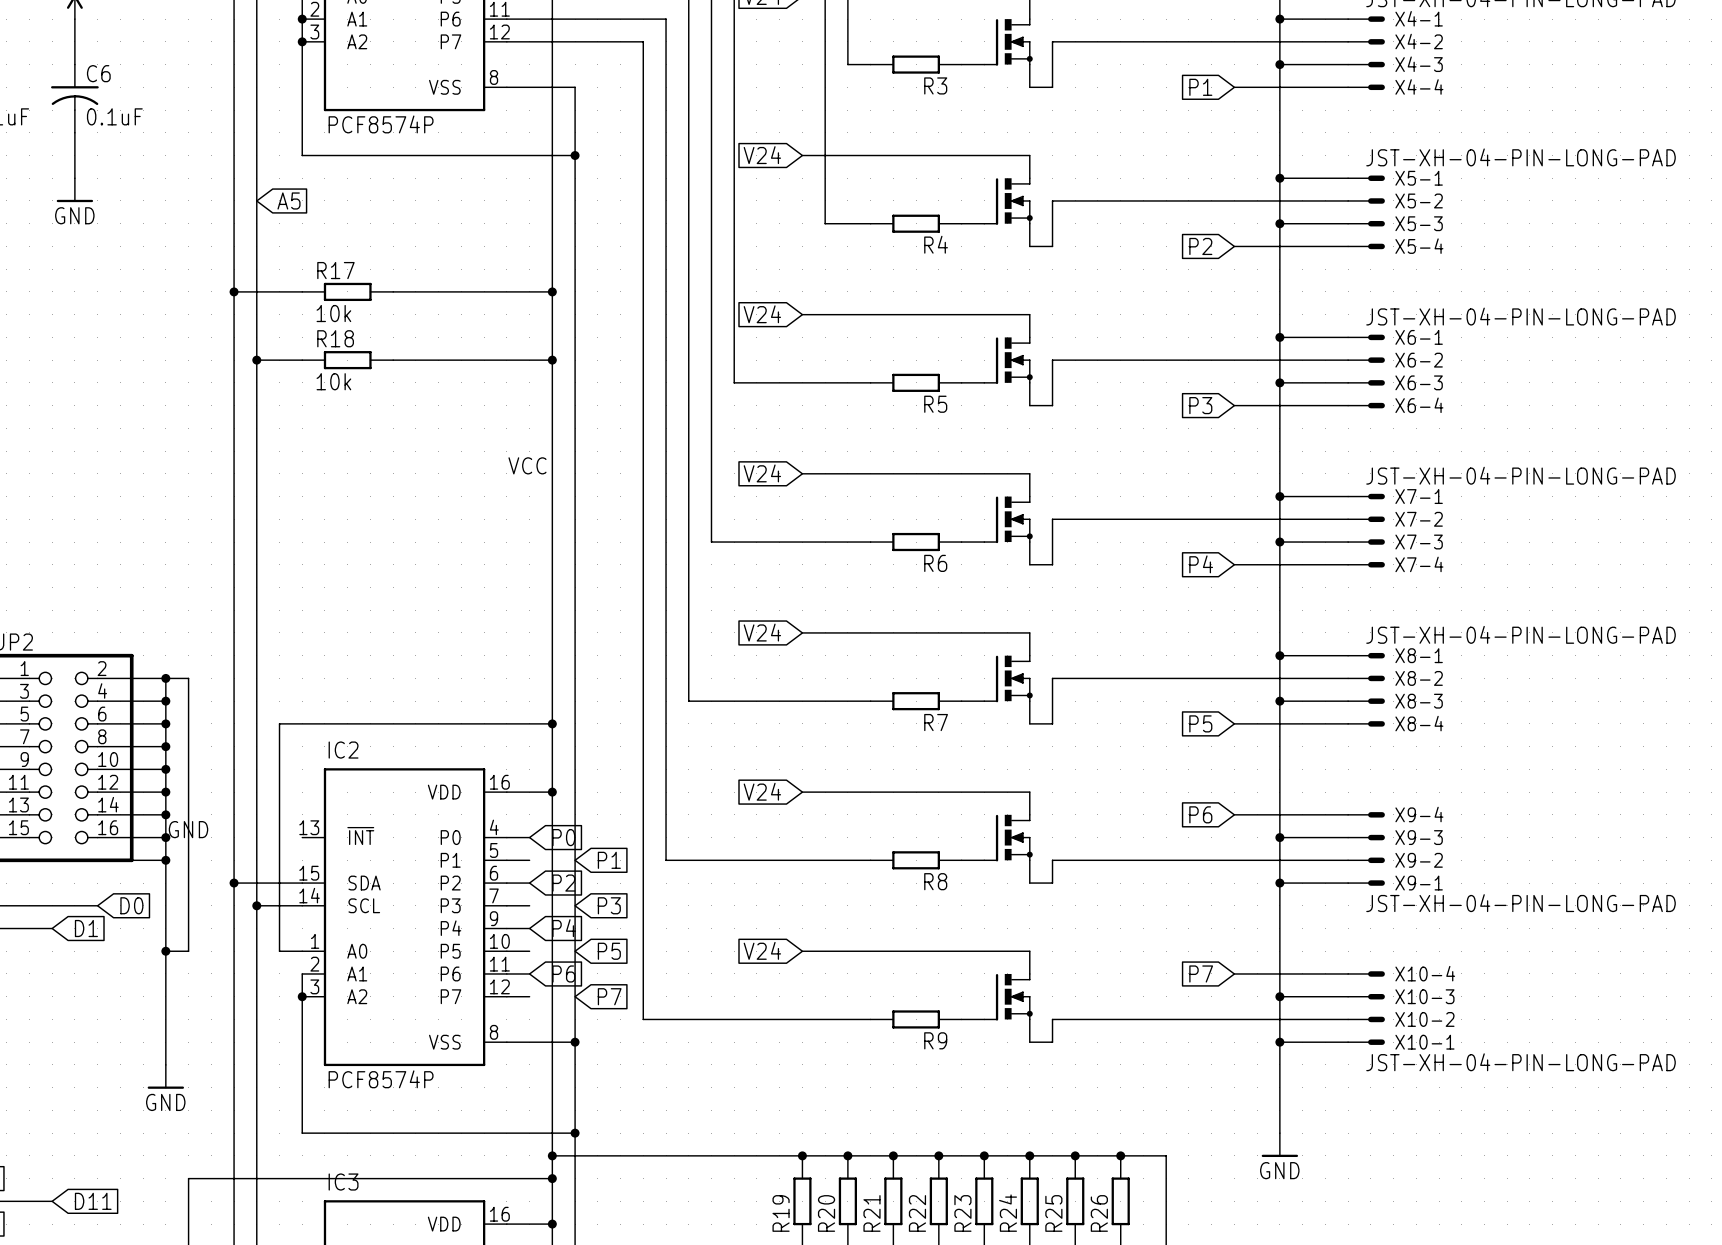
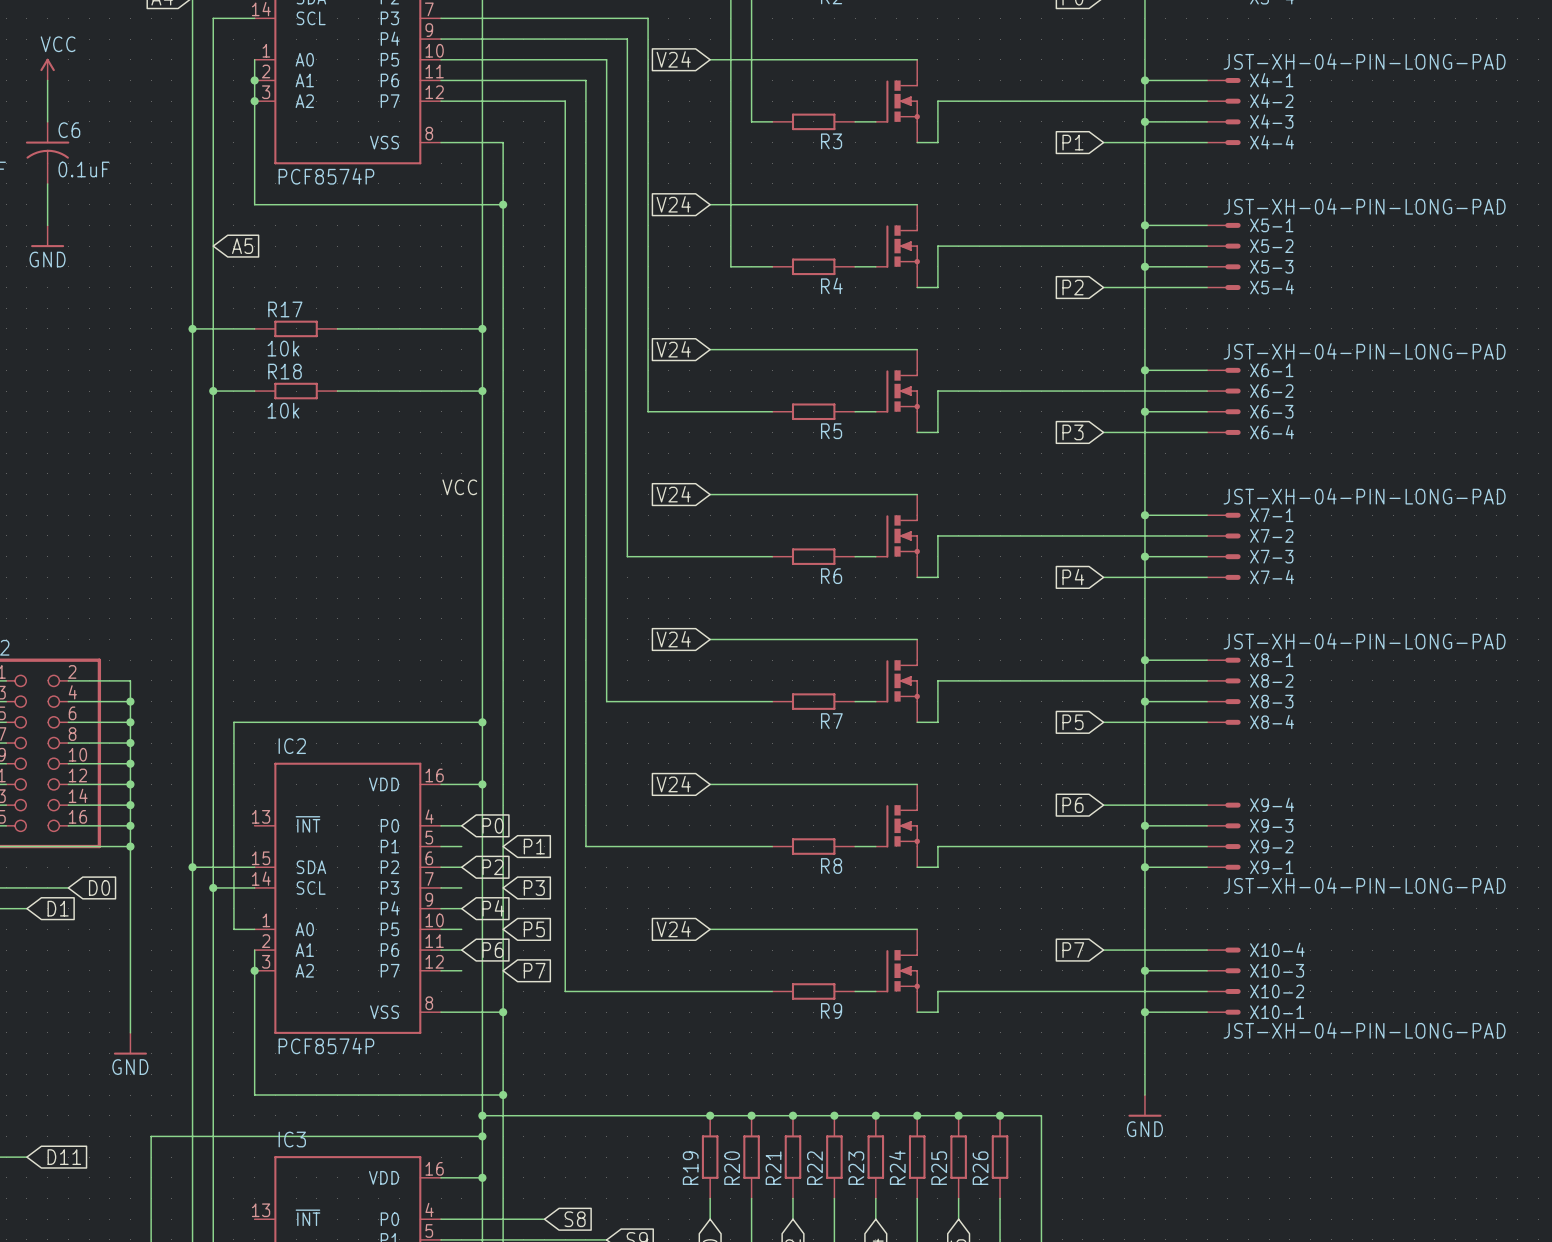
wire: (165, 678) (188, 678) (188, 951) (165, 951) -> none
junction: (165, 678) -> none
label: GND (188, 829) -> none
junction: (165, 951) -> none

